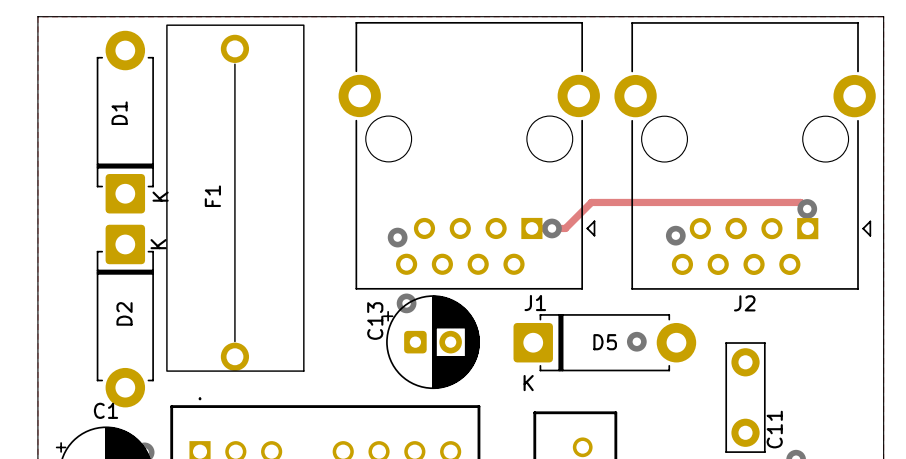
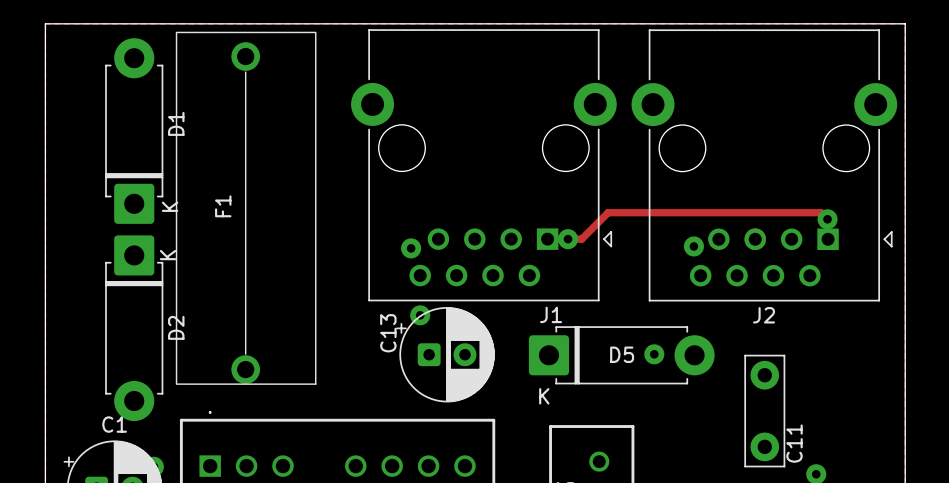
D1 name position: D1 (119, 113) -> D1 (176, 123)
D2 name position: D2 (124, 313) -> D2 (176, 327)

